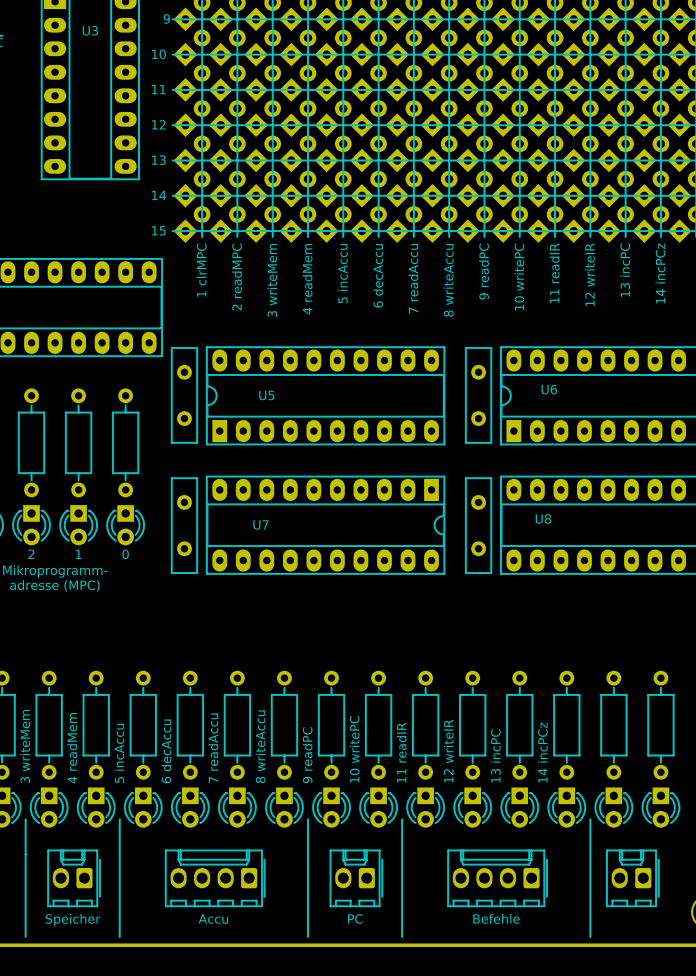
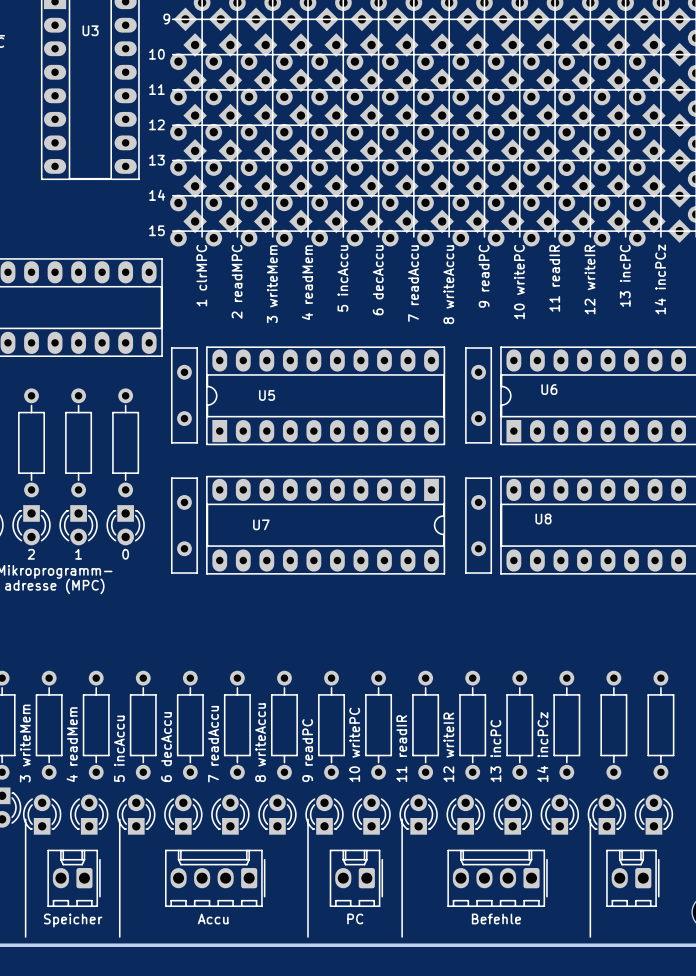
part rotation: 0° (192, 48) -> 180° (188, 51)
part rotation: 0° (227, 48) -> 180° (223, 51)
part rotation: 0° (262, 48) -> 180° (259, 51)
part rotation: 0° (297, 48) -> 180° (294, 51)
part rotation: 0° (333, 48) -> 180° (329, 51)
part rotation: 0° (368, 48) -> 180° (364, 51)
part rotation: 0° (403, 48) -> 180° (400, 51)
part rotation: 0° (439, 48) -> 180° (435, 51)
part rotation: 0° (474, 48) -> 180° (470, 51)
part rotation: 0° (509, 48) -> 180° (506, 51)
part rotation: 0° (545, 48) -> 180° (541, 51)
part rotation: 0° (580, 48) -> 180° (576, 51)
part rotation: 0° (615, 48) -> 180° (612, 51)
part rotation: 0° (650, 48) -> 180° (647, 51)
part rotation: 0° (192, 83) -> 180° (188, 86)
part rotation: 0° (227, 83) -> 180° (223, 86)
part rotation: 0° (262, 83) -> 180° (259, 86)
part rotation: 0° (297, 83) -> 180° (294, 86)
part rotation: 0° (333, 83) -> 180° (329, 86)
part rotation: 0° (368, 83) -> 180° (364, 86)
part rotation: 0° (403, 83) -> 180° (400, 86)
part rotation: 0° (439, 83) -> 180° (435, 86)
part rotation: 0° (474, 83) -> 180° (470, 87)
part rotation: 0° (509, 83) -> 180° (506, 86)
part rotation: 0° (545, 83) -> 180° (541, 86)
part rotation: 0° (580, 83) -> 180° (576, 87)
part rotation: 0° (615, 83) -> 180° (612, 86)
part rotation: 0° (650, 83) -> 180° (647, 86)
part rotation: 0° (192, 118) -> 180° (188, 122)
part rotation: 0° (227, 118) -> 180° (223, 122)
part rotation: 0° (262, 118) -> 180° (259, 122)
part rotation: 0° (297, 118) -> 180° (294, 122)
part rotation: 0° (333, 118) -> 180° (329, 122)
part rotation: 0° (368, 118) -> 180° (364, 122)
part rotation: 0° (403, 118) -> 180° (400, 122)
part rotation: 0° (439, 118) -> 180° (435, 122)
part rotation: 0° (474, 118) -> 180° (470, 122)
part rotation: 0° (509, 118) -> 180° (506, 122)
part rotation: 0° (545, 118) -> 180° (541, 122)
part rotation: 0° (580, 118) -> 180° (576, 122)
part rotation: 0° (615, 118) -> 180° (612, 122)
part rotation: 0° (650, 118) -> 180° (647, 122)
part rotation: 0° (192, 153) -> 180° (188, 157)
part rotation: 0° (227, 153) -> 180° (223, 157)
part rotation: 0° (262, 153) -> 180° (259, 157)
part rotation: 0° (297, 153) -> 180° (294, 157)
part rotation: 0° (333, 153) -> 180° (329, 157)
part rotation: 0° (368, 153) -> 180° (364, 157)
part rotation: 0° (403, 153) -> 180° (400, 157)
part rotation: 0° (439, 153) -> 180° (435, 157)
part rotation: 0° (474, 153) -> 180° (470, 157)
part rotation: 0° (509, 153) -> 180° (506, 157)
part rotation: 0° (545, 153) -> 180° (541, 157)
part rotation: 0° (580, 153) -> 180° (576, 157)
part rotation: 0° (615, 153) -> 180° (612, 157)
part rotation: 0° (650, 153) -> 180° (647, 157)
part rotation: 0° (192, 189) -> 180° (188, 192)
part rotation: 0° (227, 189) -> 180° (223, 192)
part rotation: 0° (262, 189) -> 180° (259, 192)
part rotation: 0° (297, 189) -> 180° (294, 192)
part rotation: 0° (333, 189) -> 180° (329, 192)
part rotation: 0° (368, 189) -> 180° (364, 192)
part rotation: 0° (403, 189) -> 180° (400, 192)
part rotation: 0° (439, 189) -> 180° (435, 192)
part rotation: 0° (474, 189) -> 180° (470, 192)
part rotation: 0° (509, 189) -> 180° (506, 192)
part rotation: 0° (545, 189) -> 180° (541, 192)
part rotation: 0° (580, 189) -> 180° (576, 192)
part rotation: 0° (615, 189) -> 180° (612, 192)
part rotation: 0° (650, 189) -> 180° (647, 192)
part rotation: 0° (192, 224) -> 180° (188, 228)
part rotation: 0° (227, 224) -> 180° (223, 228)
part rotation: 0° (262, 224) -> 180° (259, 228)
part rotation: 0° (297, 224) -> 180° (294, 228)
part rotation: 0° (333, 224) -> 180° (329, 228)
part rotation: 0° (368, 224) -> 180° (364, 228)
part rotation: 0° (403, 224) -> 180° (400, 228)
part rotation: 0° (439, 224) -> 180° (435, 228)
part rotation: 0° (474, 224) -> 180° (470, 228)
part rotation: 0° (509, 224) -> 180° (506, 228)
part rotation: 0° (545, 224) -> 180° (541, 228)
part rotation: 0° (580, 224) -> 180° (576, 228)
part rotation: 0° (615, 224) -> 180° (612, 228)
part rotation: 0° (650, 224) -> 180° (647, 228)
part rotation: 0° (49, 807) -> 180° (42, 814)
part rotation: 0° (96, 807) -> 180° (89, 814)
part rotation: 0° (143, 807) -> 180° (136, 814)
part rotation: 0° (190, 807) -> 180° (183, 814)
part rotation: 0° (237, 807) -> 180° (230, 814)
part rotation: 0° (284, 807) -> 180° (277, 814)
part rotation: 0° (331, 807) -> 180° (324, 814)
part rotation: 0° (378, 807) -> 180° (371, 814)
part rotation: 0° (425, 807) -> 180° (418, 814)
part rotation: 0° (472, 807) -> 180° (465, 814)
part rotation: 0° (519, 807) -> 180° (512, 814)
part rotation: 0° (566, 807) -> 180° (559, 814)
part rotation: 0° (613, 807) -> 180° (606, 814)
part rotation: 0° (660, 807) -> 180° (653, 814)

